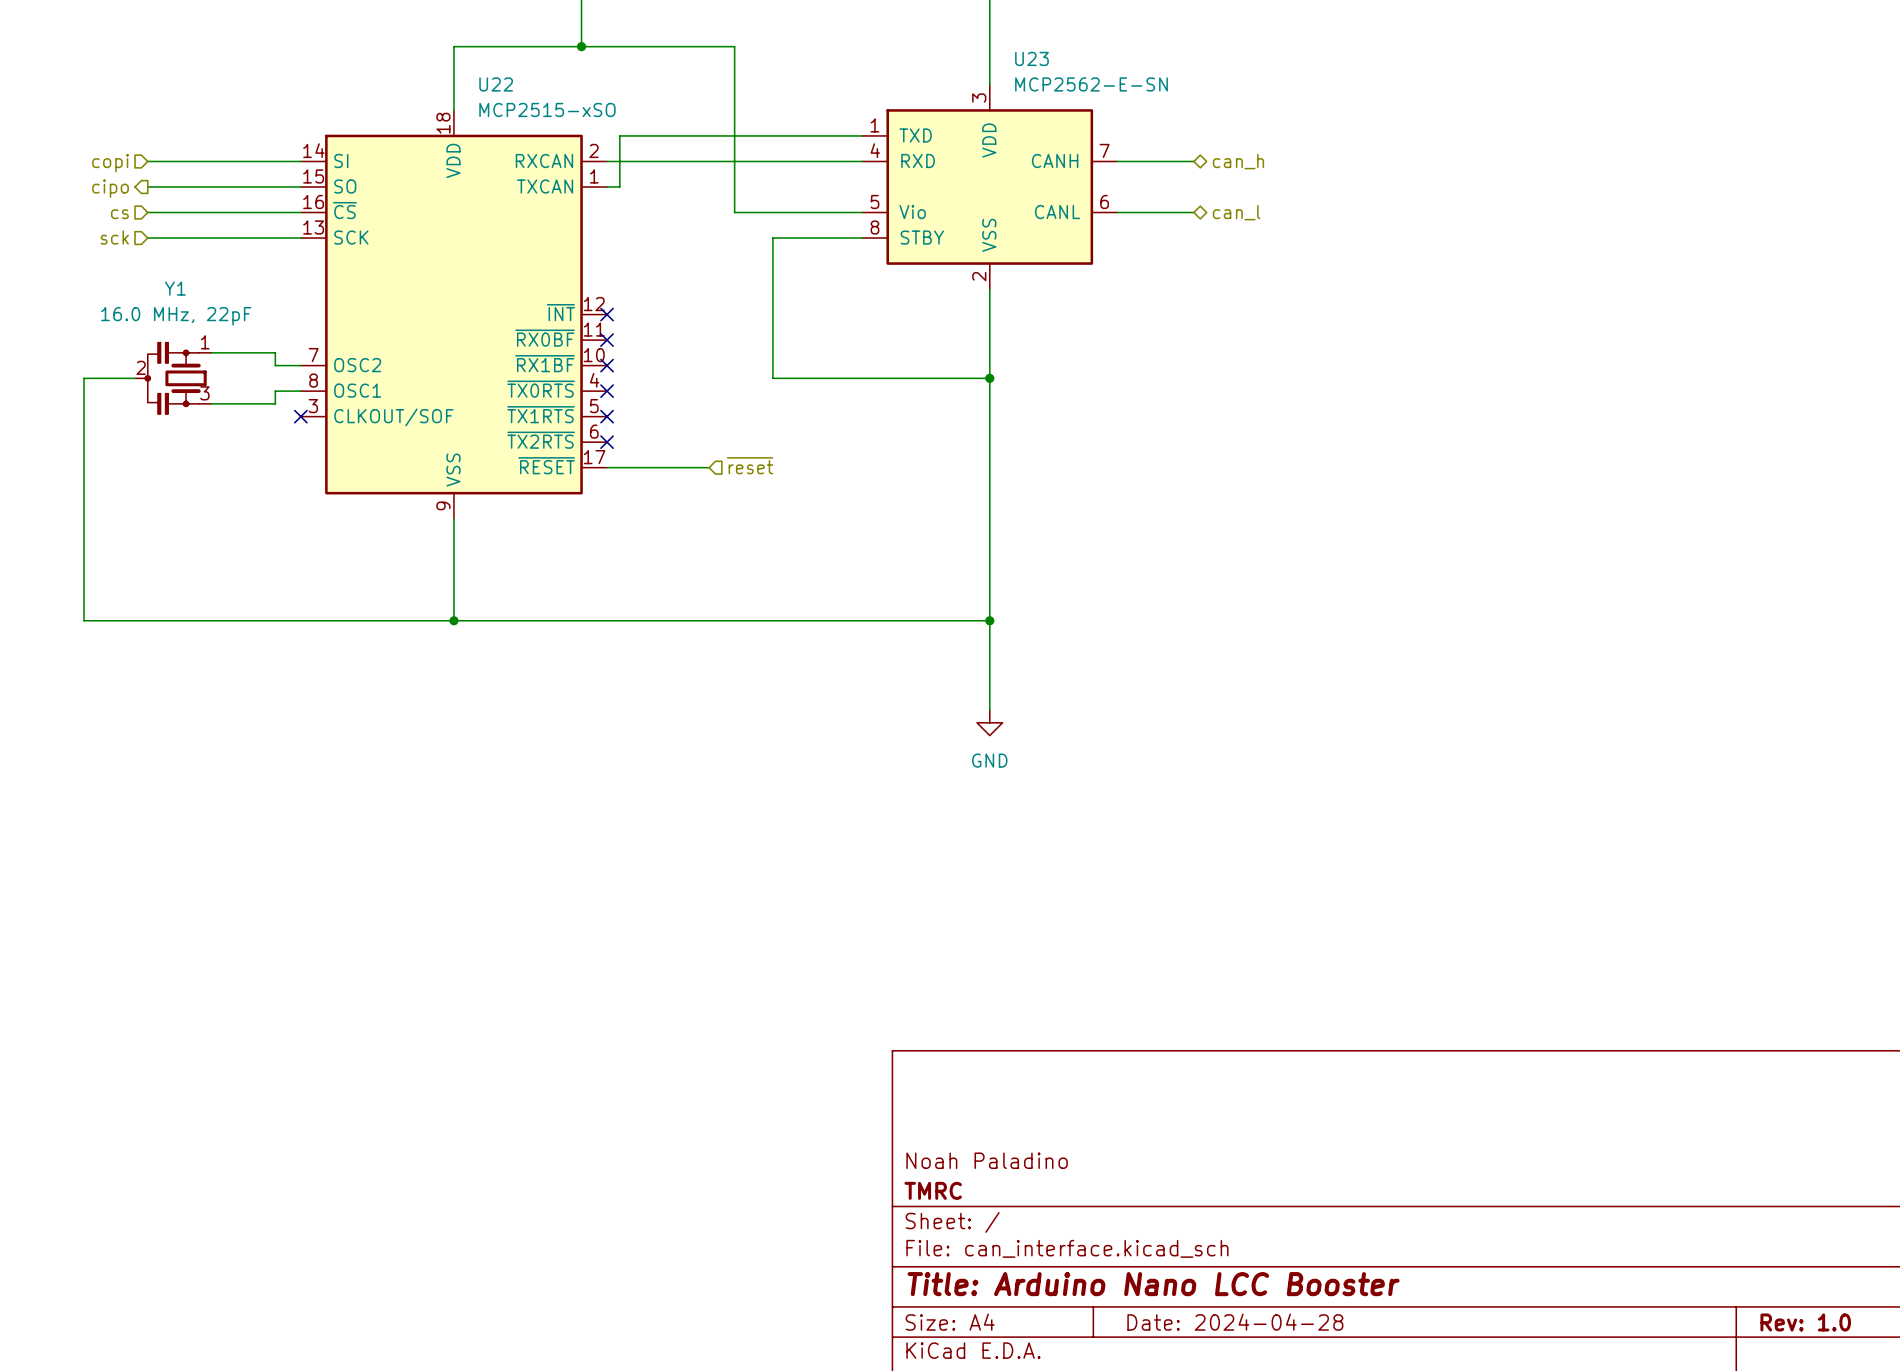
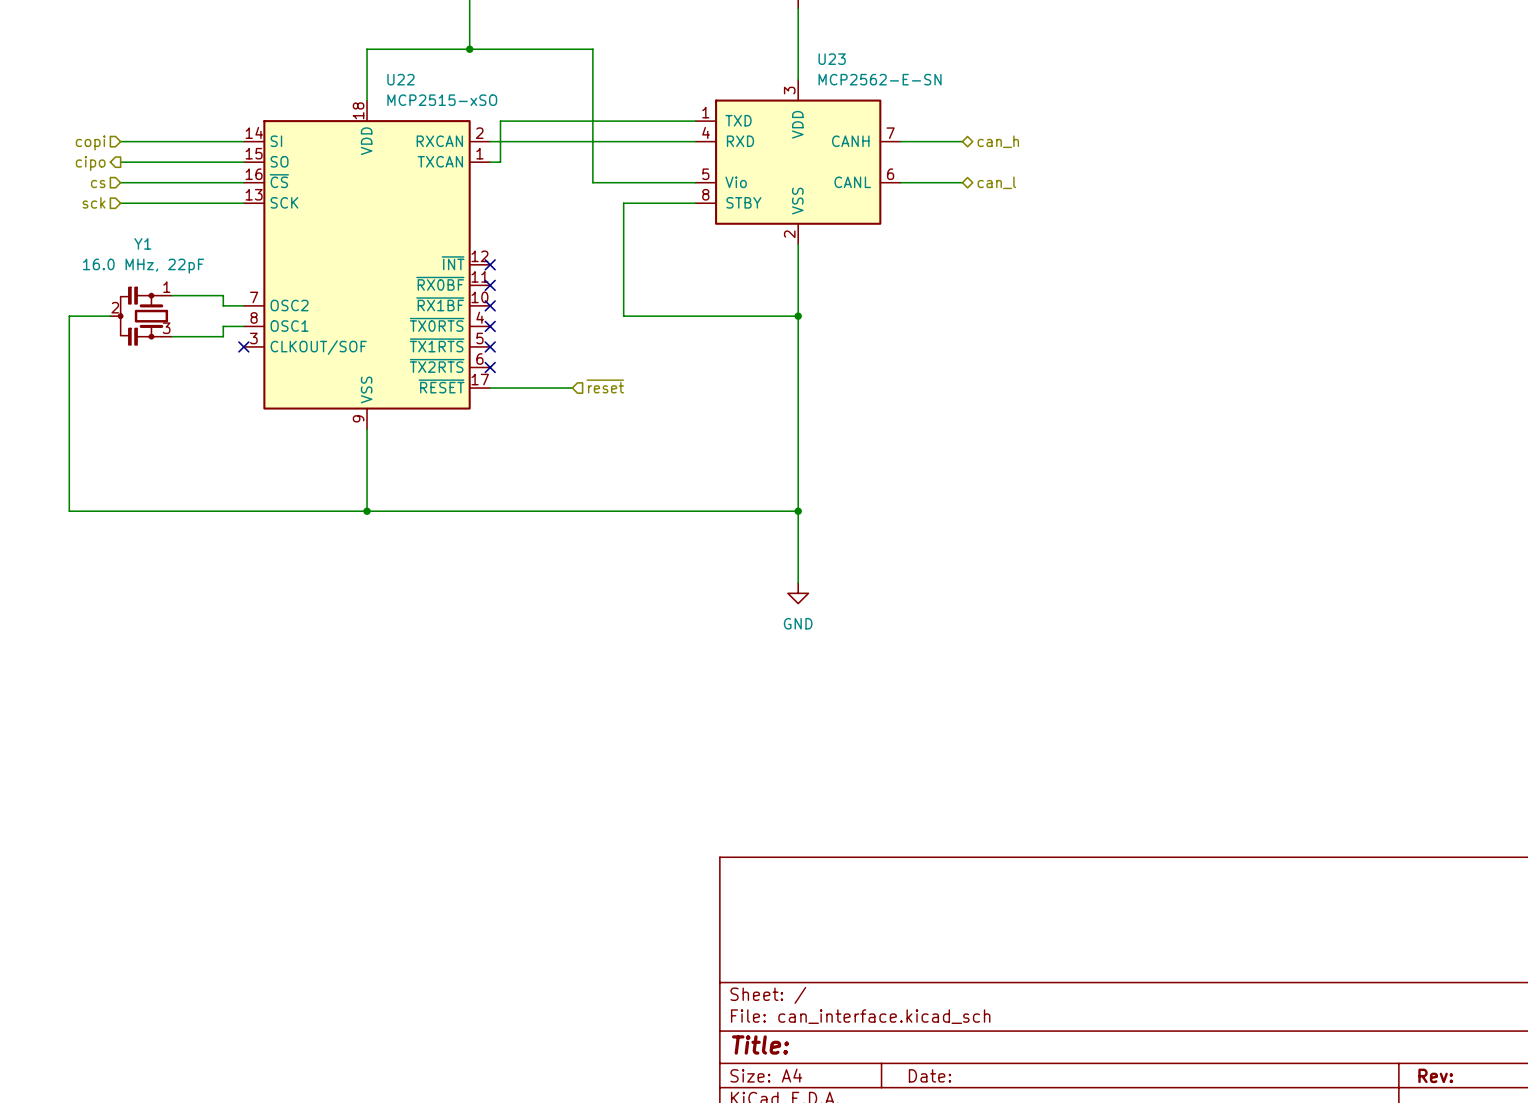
title block: Noah Paladino (987, 1160) -> none
title block: TMRC (933, 1190) -> none
title block: Title: Arduino Nano LCC Booster (1153, 1284) -> Title: (760, 1045)
title block: Date: 2024-04-28 (1235, 1322) -> Date: (929, 1075)
title block: Rev: 1.0 (1805, 1322) -> Rev: (1435, 1075)

